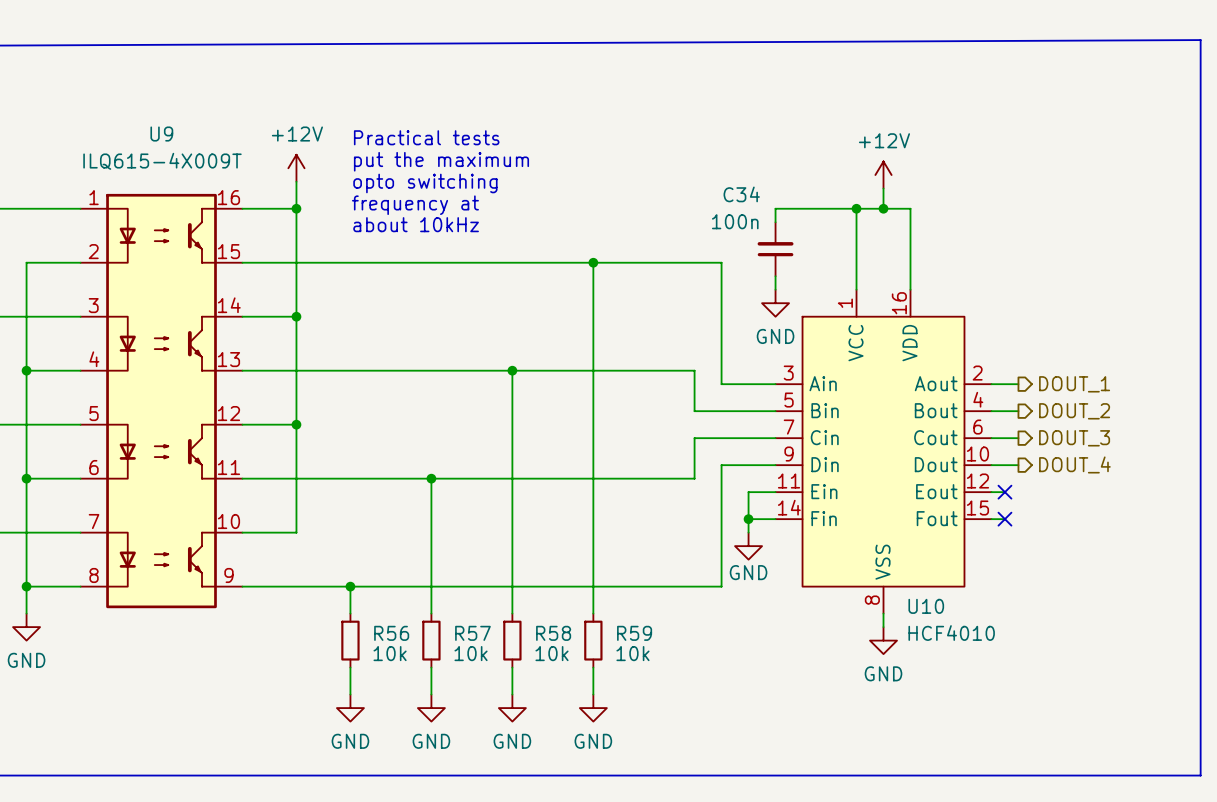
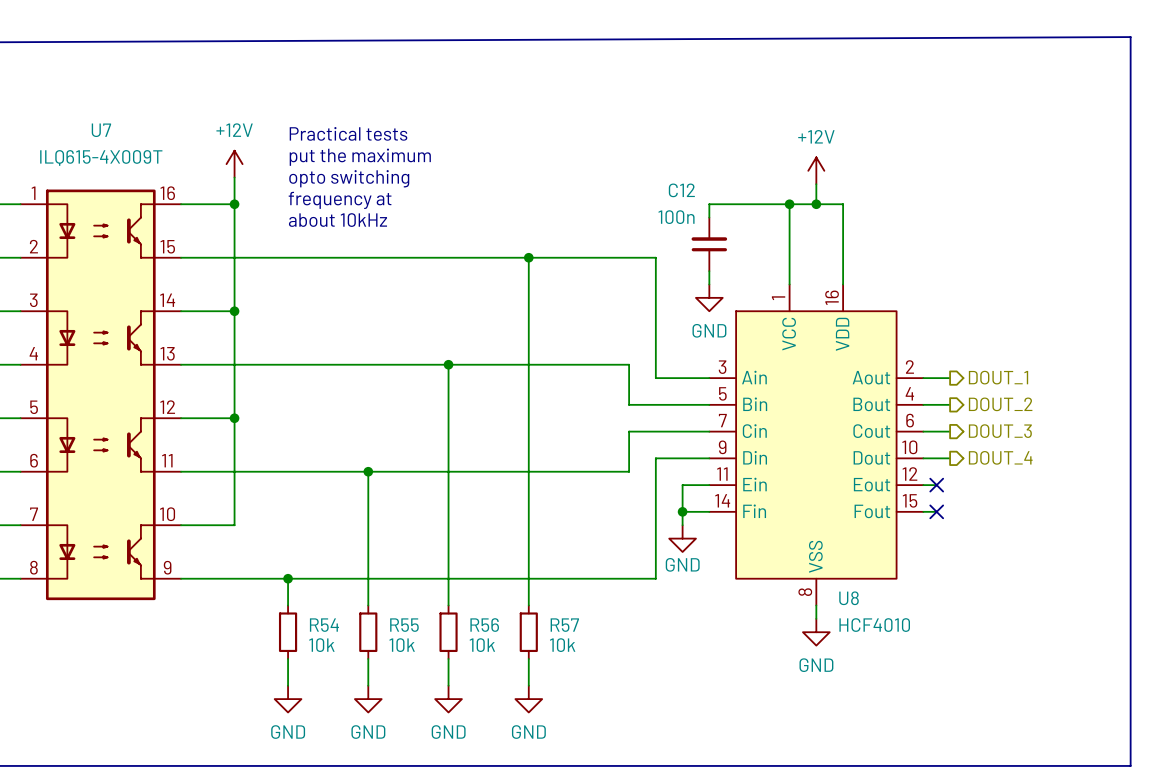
U9 name: U9 (161, 134) -> U7 (101, 130)
C34 name: C34 (741, 194) -> C12 (681, 190)
U10 name: U10 (926, 606) -> U8 (849, 598)
R56 name: R56 (391, 633) -> R54 (324, 625)
R57 name: R57 (472, 633) -> R55 (404, 625)
R58 name: R58 (553, 633) -> R56 (484, 625)
R59 name: R59 (634, 633) -> R57 (564, 625)

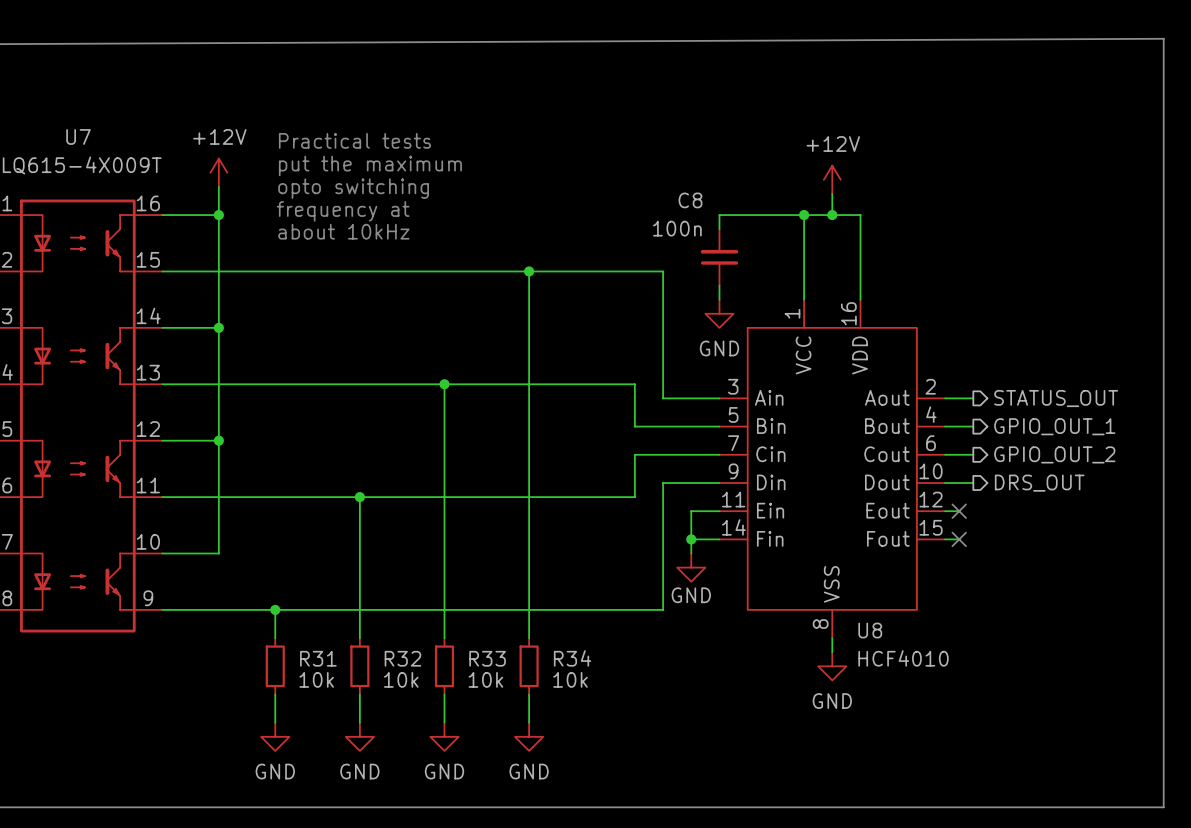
C12 name: C12 (681, 190) -> C8 (690, 200)
hierarchical label: DOUT_1 (998, 377) -> STATUS_OUT (1056, 398)
hierarchical label: DOUT_2 (1000, 404) -> GPIO_OUT_1 (1054, 426)
hierarchical label: DOUT_3 (1000, 431) -> GPIO_OUT_2 (1054, 454)
hierarchical label: DOUT_4 (1000, 457) -> DRS_OUT (1039, 483)
R54 name: R54 (324, 625) -> R31 (318, 658)
R55 name: R55 (404, 625) -> R32 (402, 658)
R56 name: R56 (484, 625) -> R33 (487, 658)
R57 name: R57 (564, 625) -> R34 (572, 658)

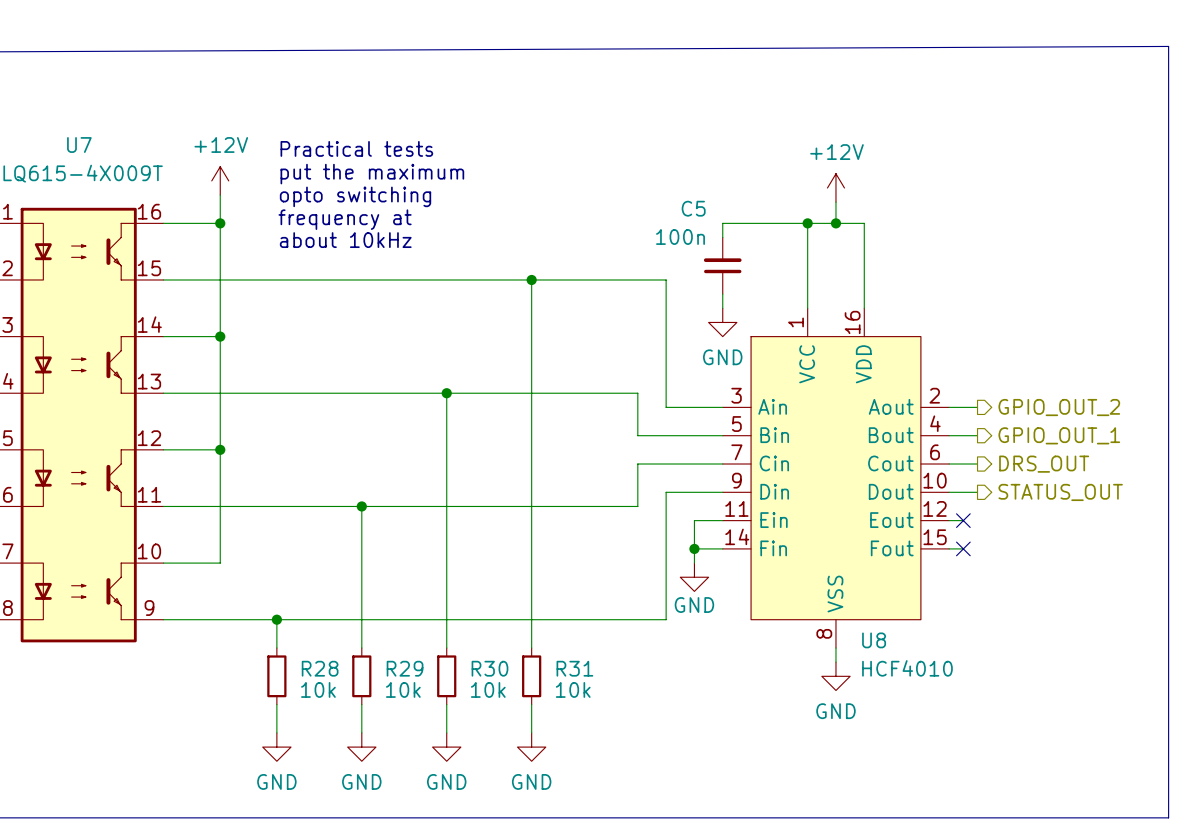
C8 name: C8 (690, 200) -> C5 (693, 208)
hierarchical label: STATUS_OUT (1056, 398) -> GPIO_OUT_2 (1059, 407)
hierarchical label: GPIO_OUT_2 (1054, 454) -> DRS_OUT (1044, 464)
hierarchical label: DRS_OUT (1039, 483) -> STATUS_OUT (1060, 492)
R31 name: R31 (318, 658) -> R28 (320, 668)
R32 name: R32 (402, 658) -> R29 (405, 668)
R33 name: R33 (487, 658) -> R30 (489, 668)
R34 name: R34 (572, 658) -> R31 (574, 668)

